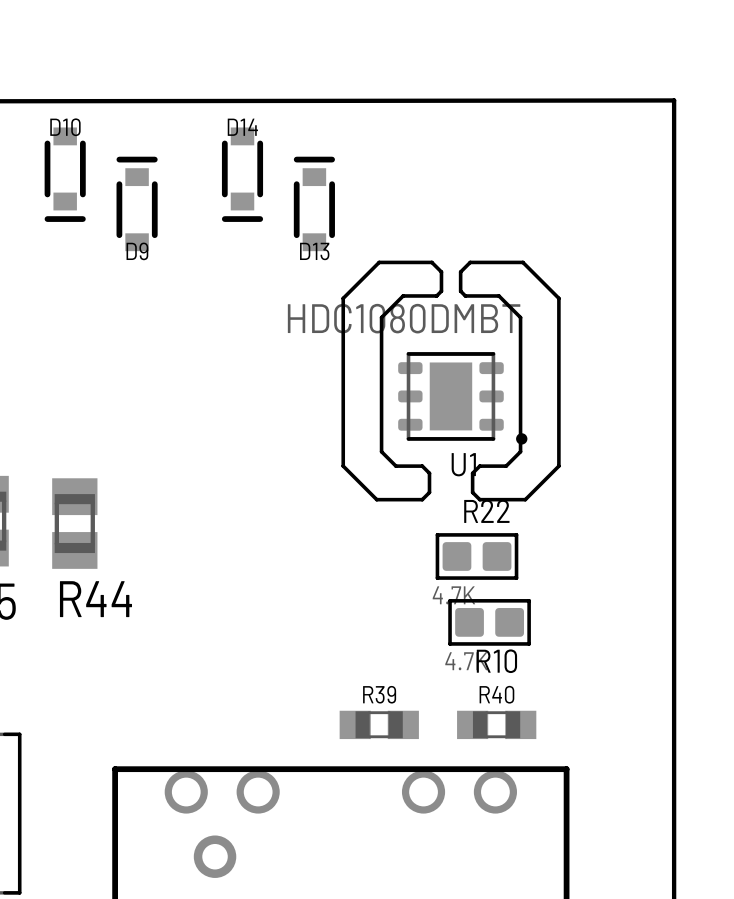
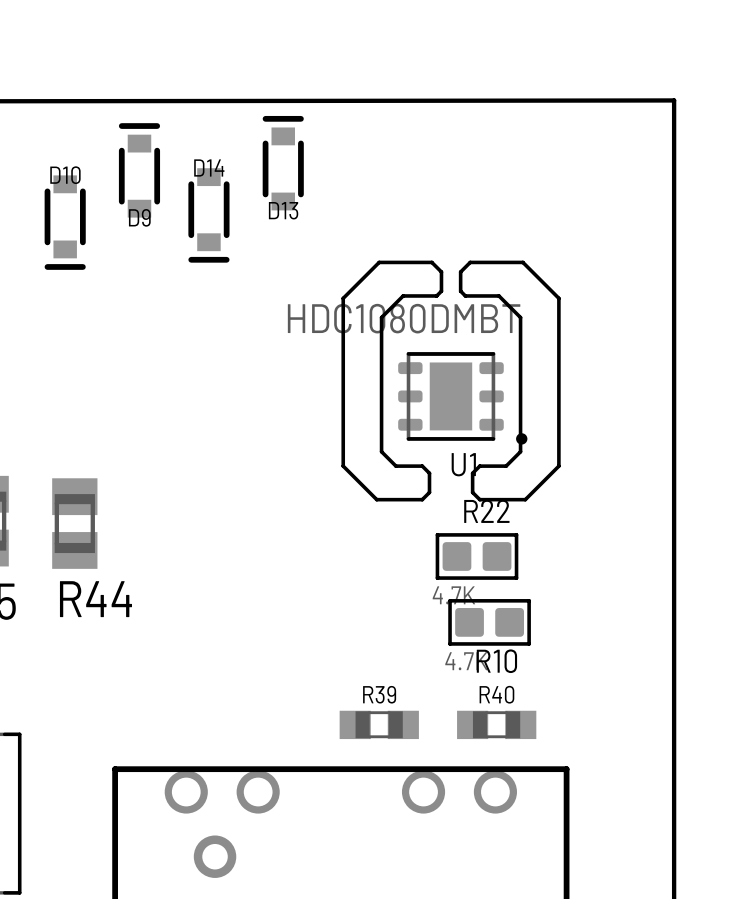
D10 position: (65, 174) -> (65, 222)
D14 position: (242, 174) -> (208, 215)
D9 position: (137, 203) -> (139, 170)
D13 position: (314, 203) -> (283, 163)

